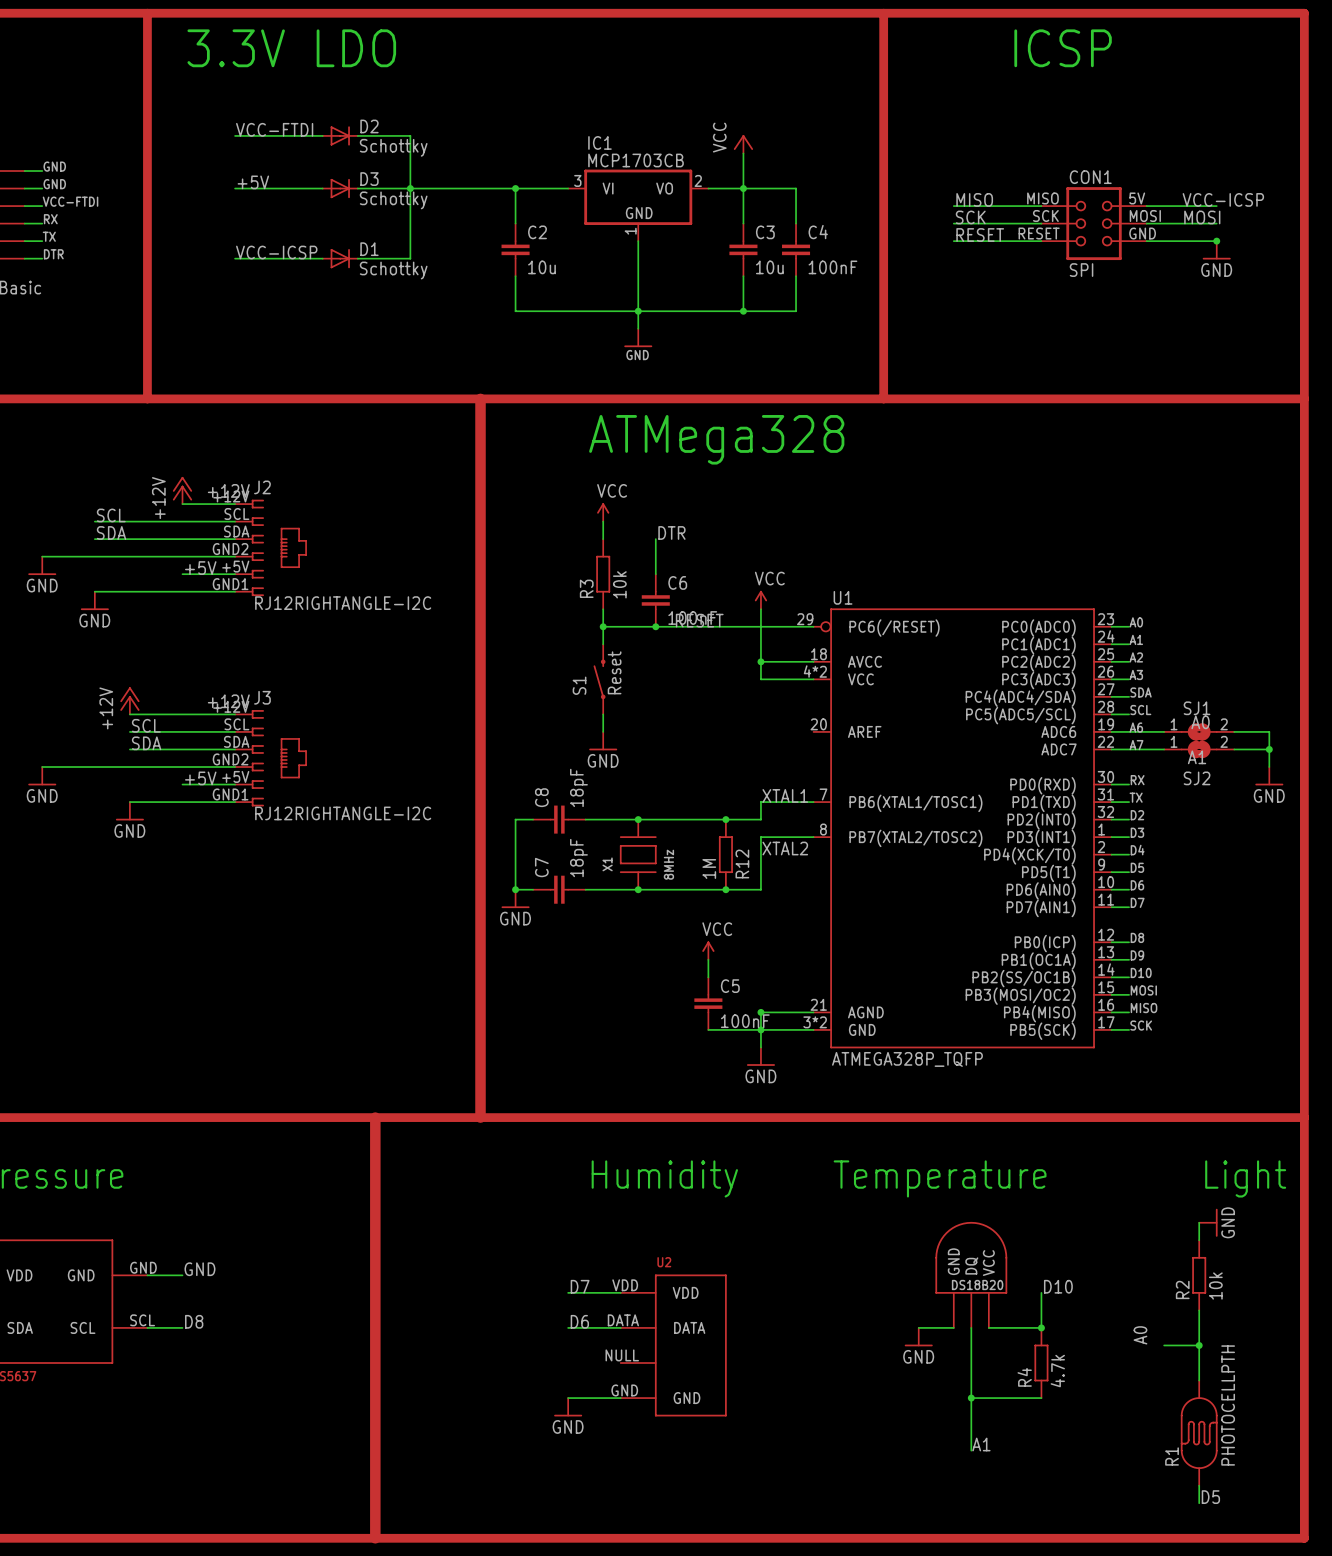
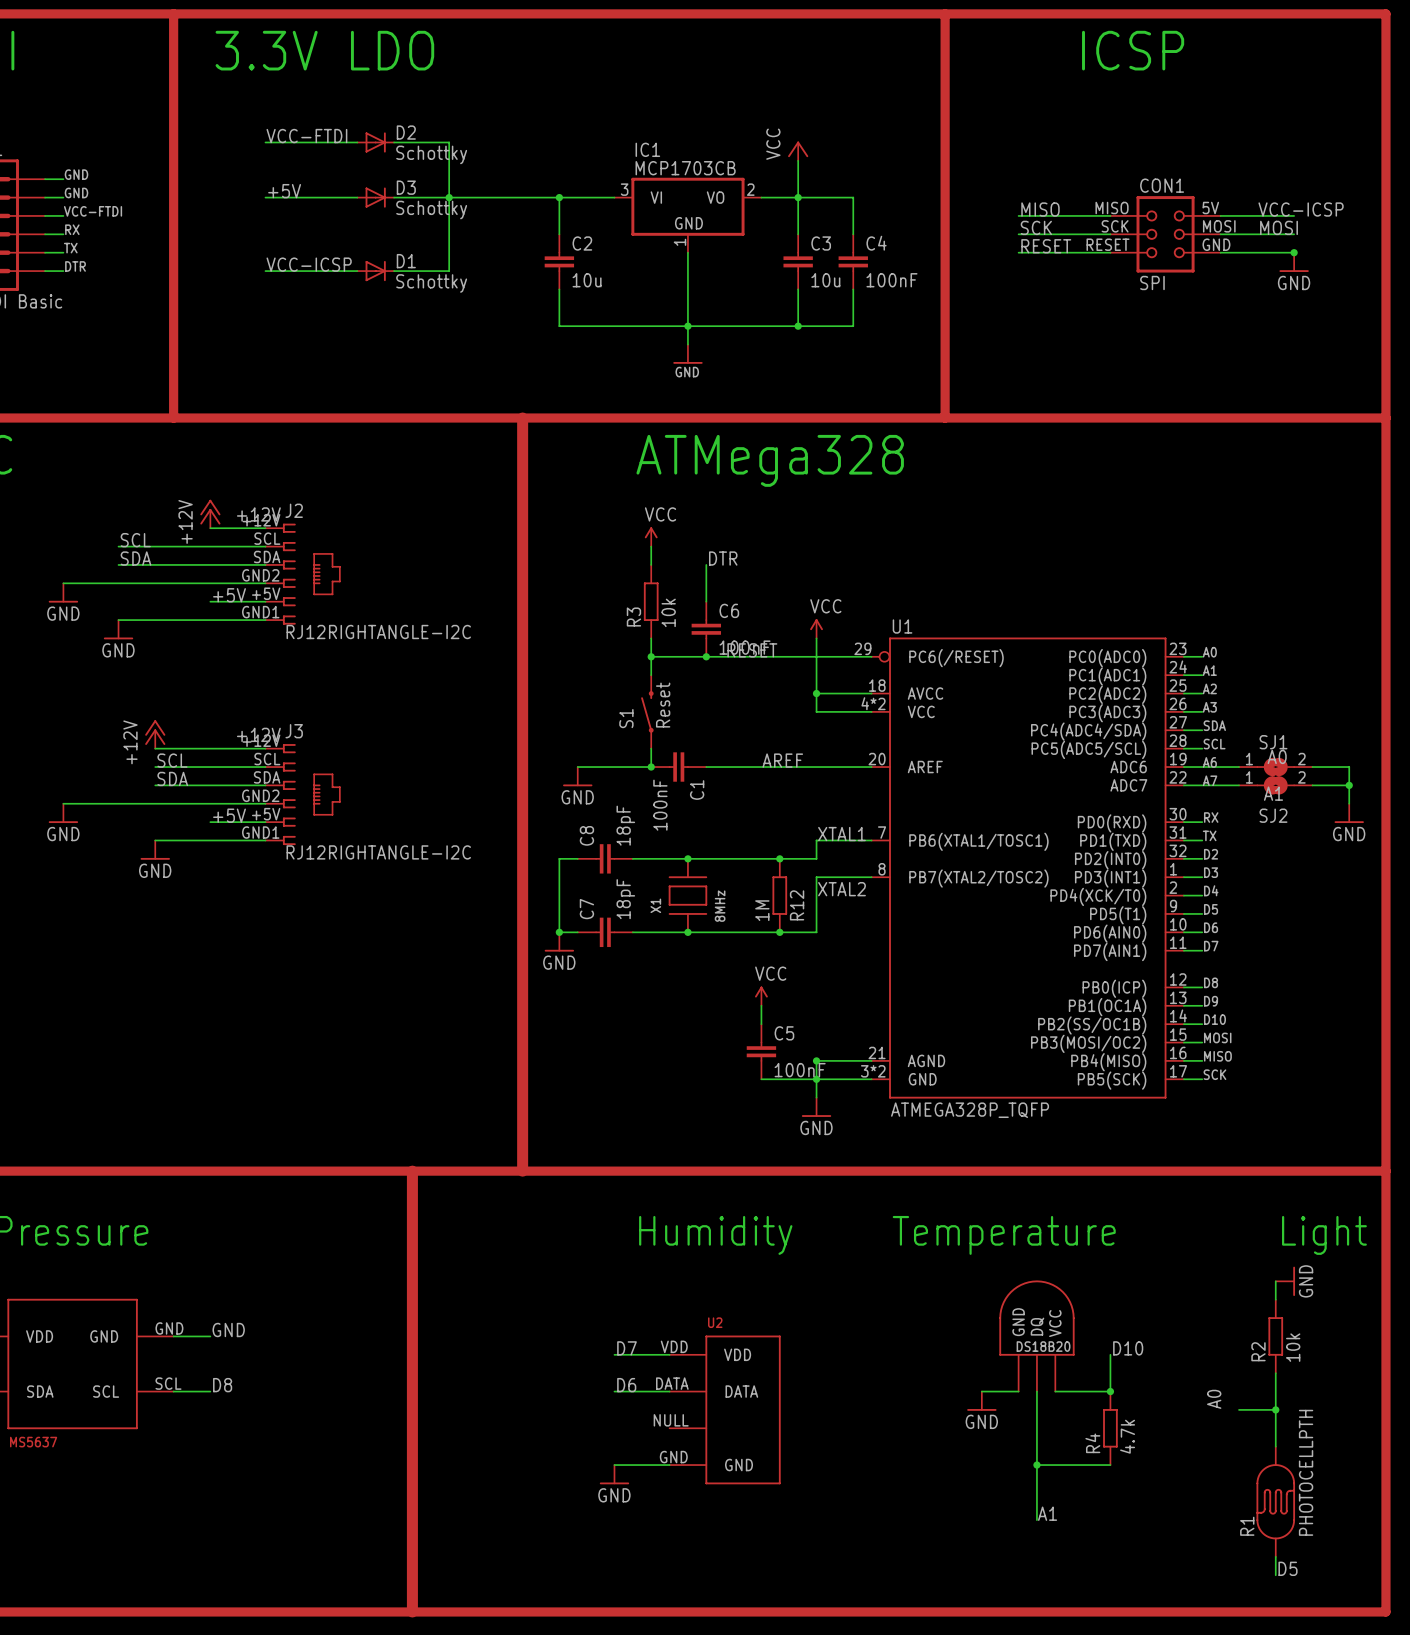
label: none -> AREF (782, 760)
wire: none -> (577, 767) (651, 767)
junction: none -> (651, 767)
C1: none -> 100nF (678, 767)
wire: none -> (706, 767) (871, 767)
power symbol position: GND (603, 741) -> GND (577, 776)

